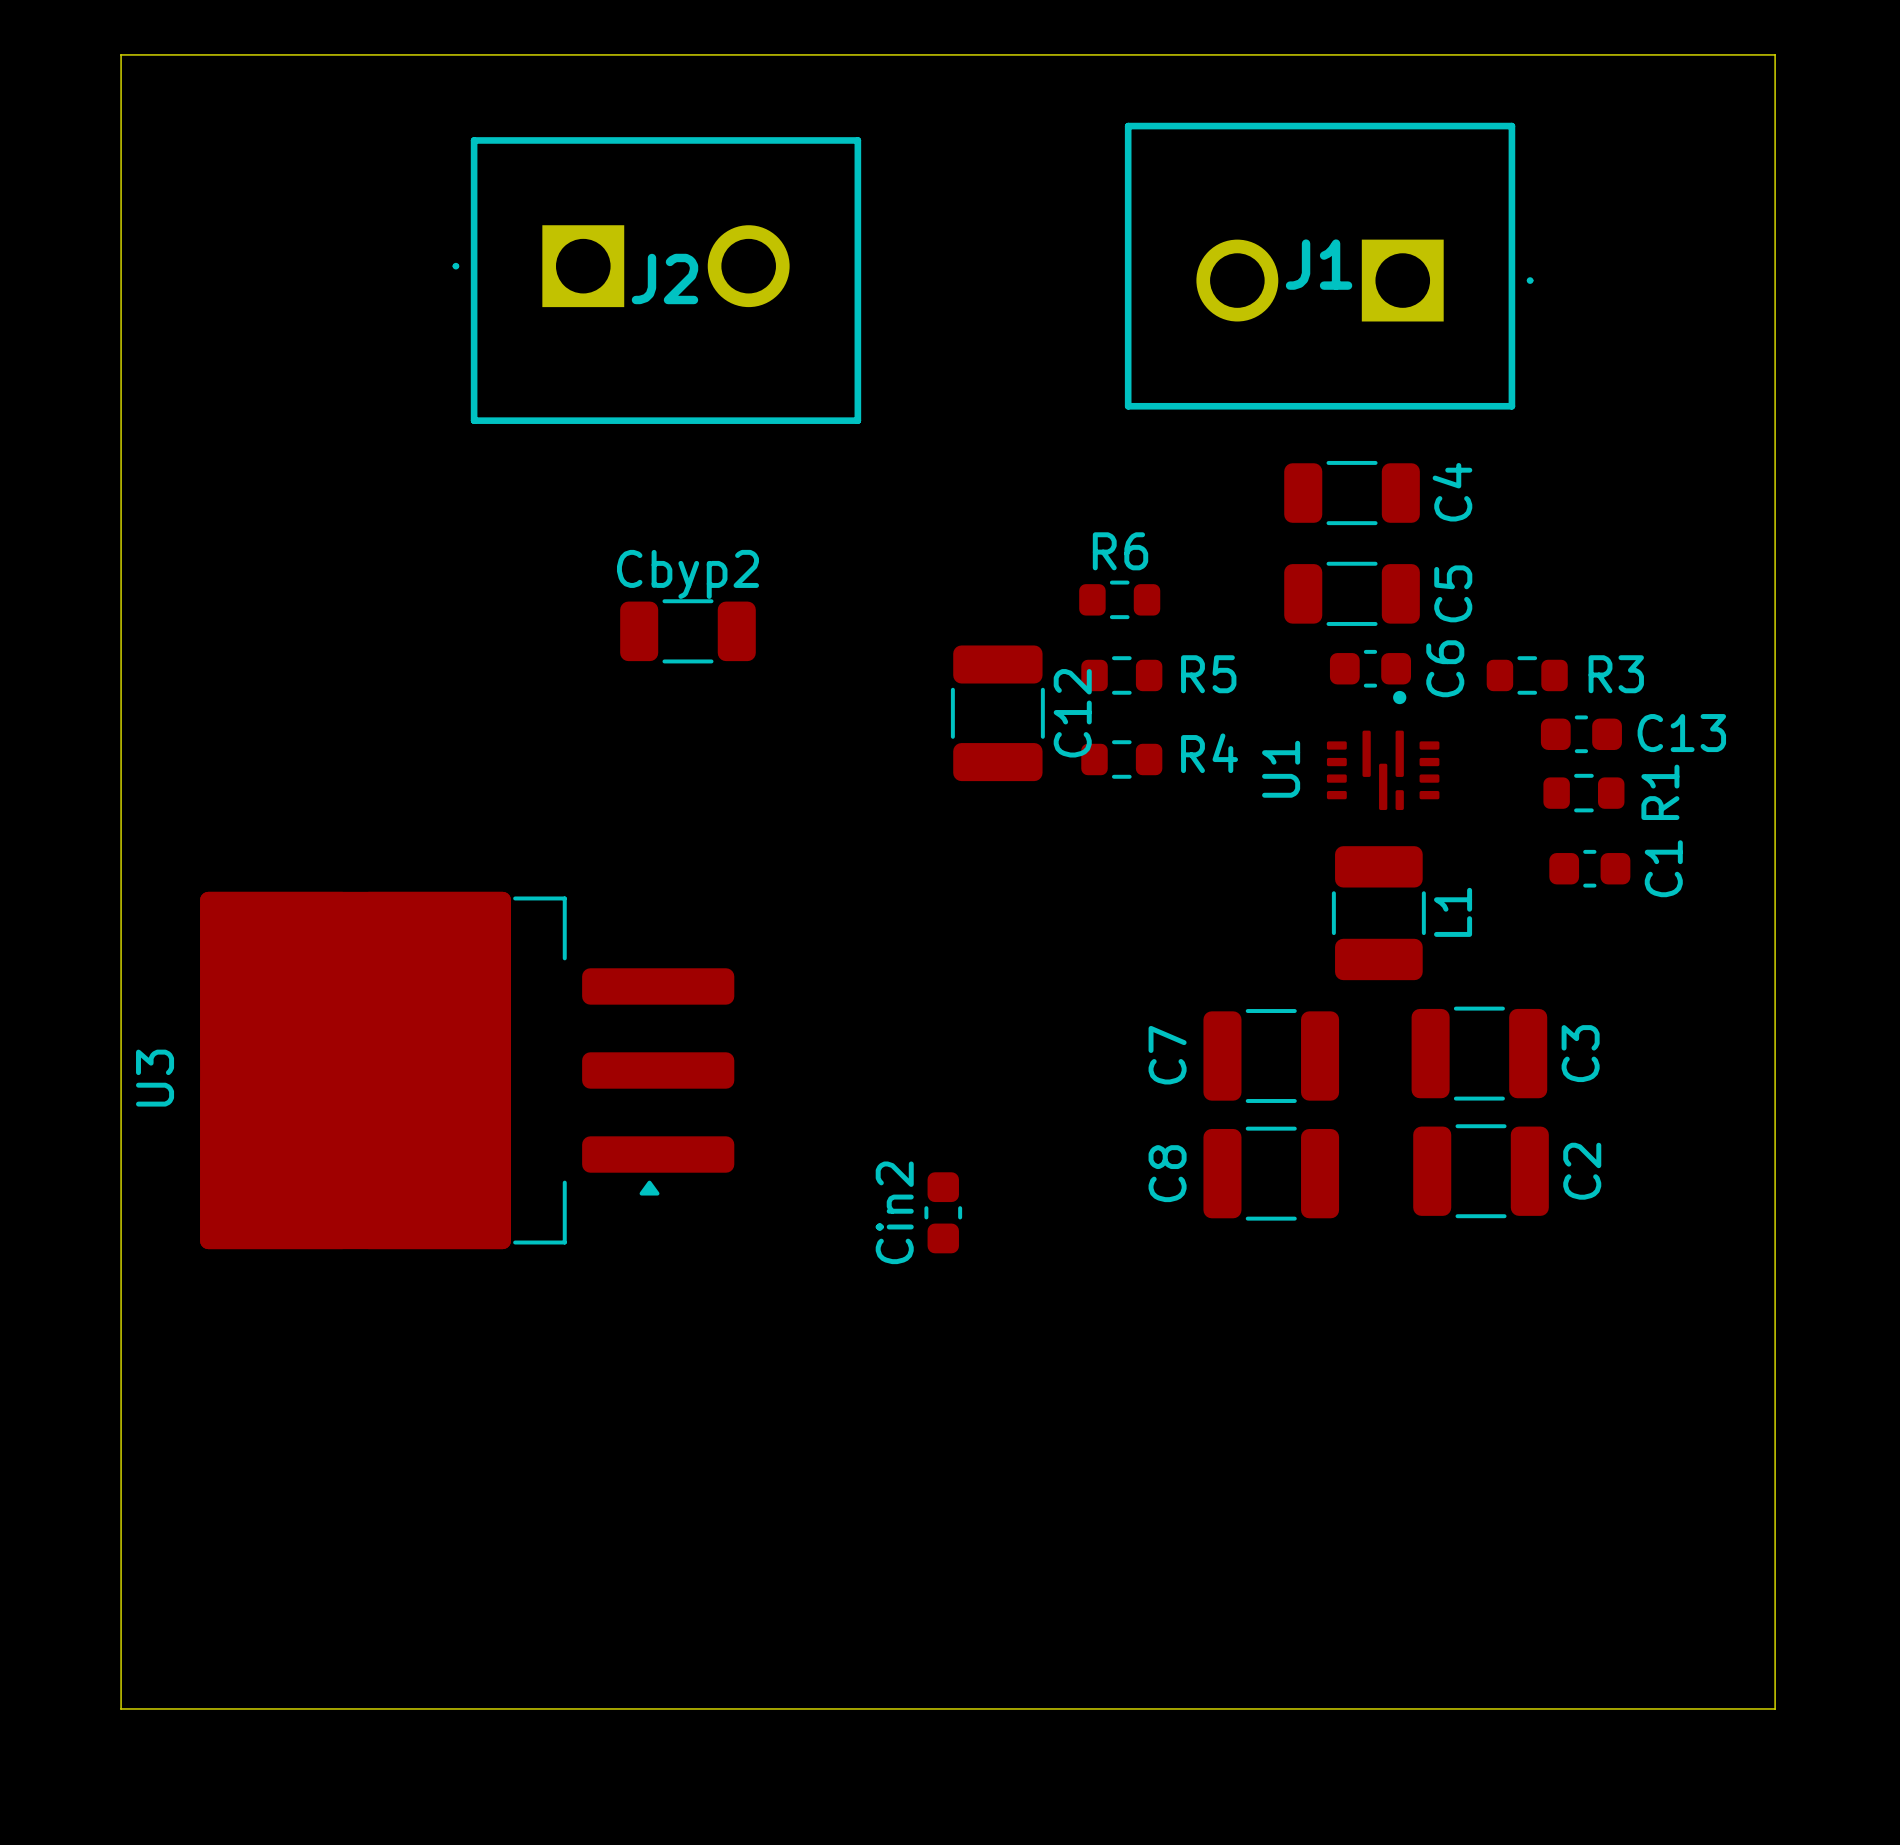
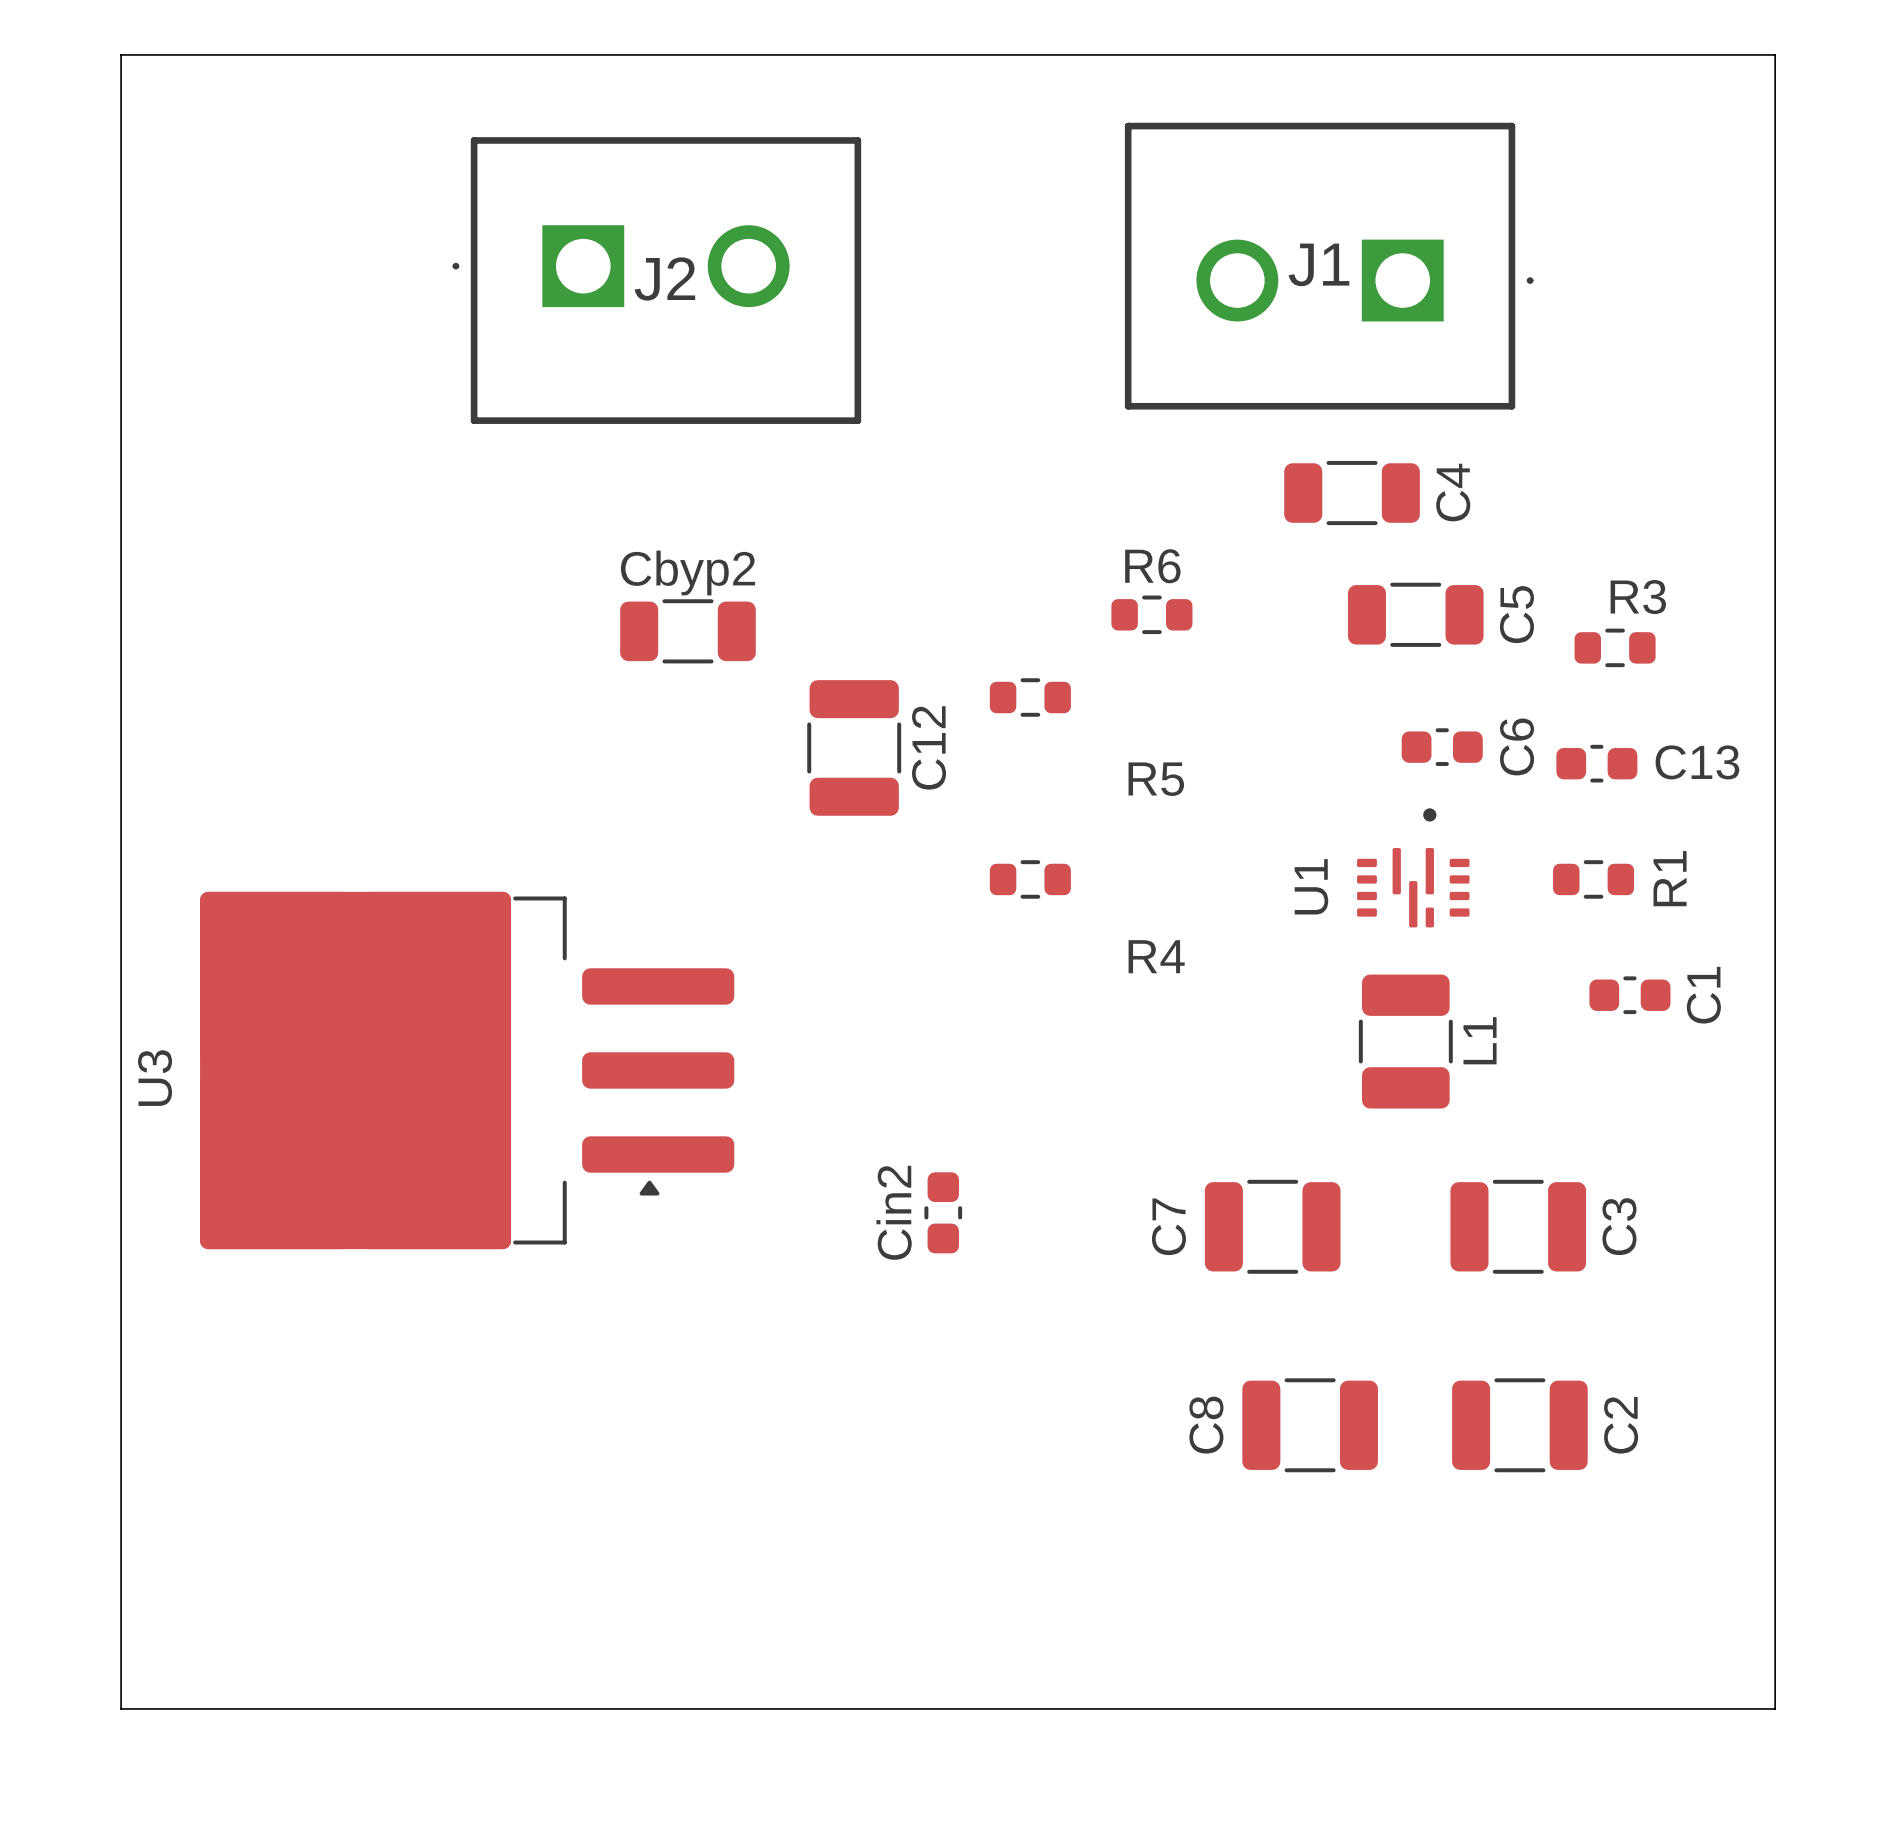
C5 position: (1352, 593) -> (1415, 614)
R6 position: (1119, 599) -> (1151, 614)
C6 position: (1370, 668) -> (1442, 747)
R5 name position: R5 (1208, 674) -> R5 (1156, 779)
R3 name position: R3 (1616, 674) -> R3 (1638, 597)
R5 position: (1121, 675) -> (1030, 697)
R3 position: (1527, 675) -> (1615, 647)
C12 position: (997, 713) -> (854, 747)
C13 position: (1581, 734) -> (1596, 763)
U1 position: (1383, 750) -> (1413, 867)
R4 name position: R4 (1209, 753) -> R4 (1156, 956)
R4 position: (1121, 759) -> (1030, 879)
R1 position: (1583, 793) -> (1593, 879)
C1 position: (1589, 868) -> (1629, 995)
L1 position: (1378, 913) -> (1405, 1041)
C3 position: (1479, 1053) -> (1518, 1226)
C7 position: (1271, 1056) -> (1272, 1226)
C2 position: (1481, 1171) -> (1519, 1425)
C8 position: (1271, 1173) -> (1310, 1425)

